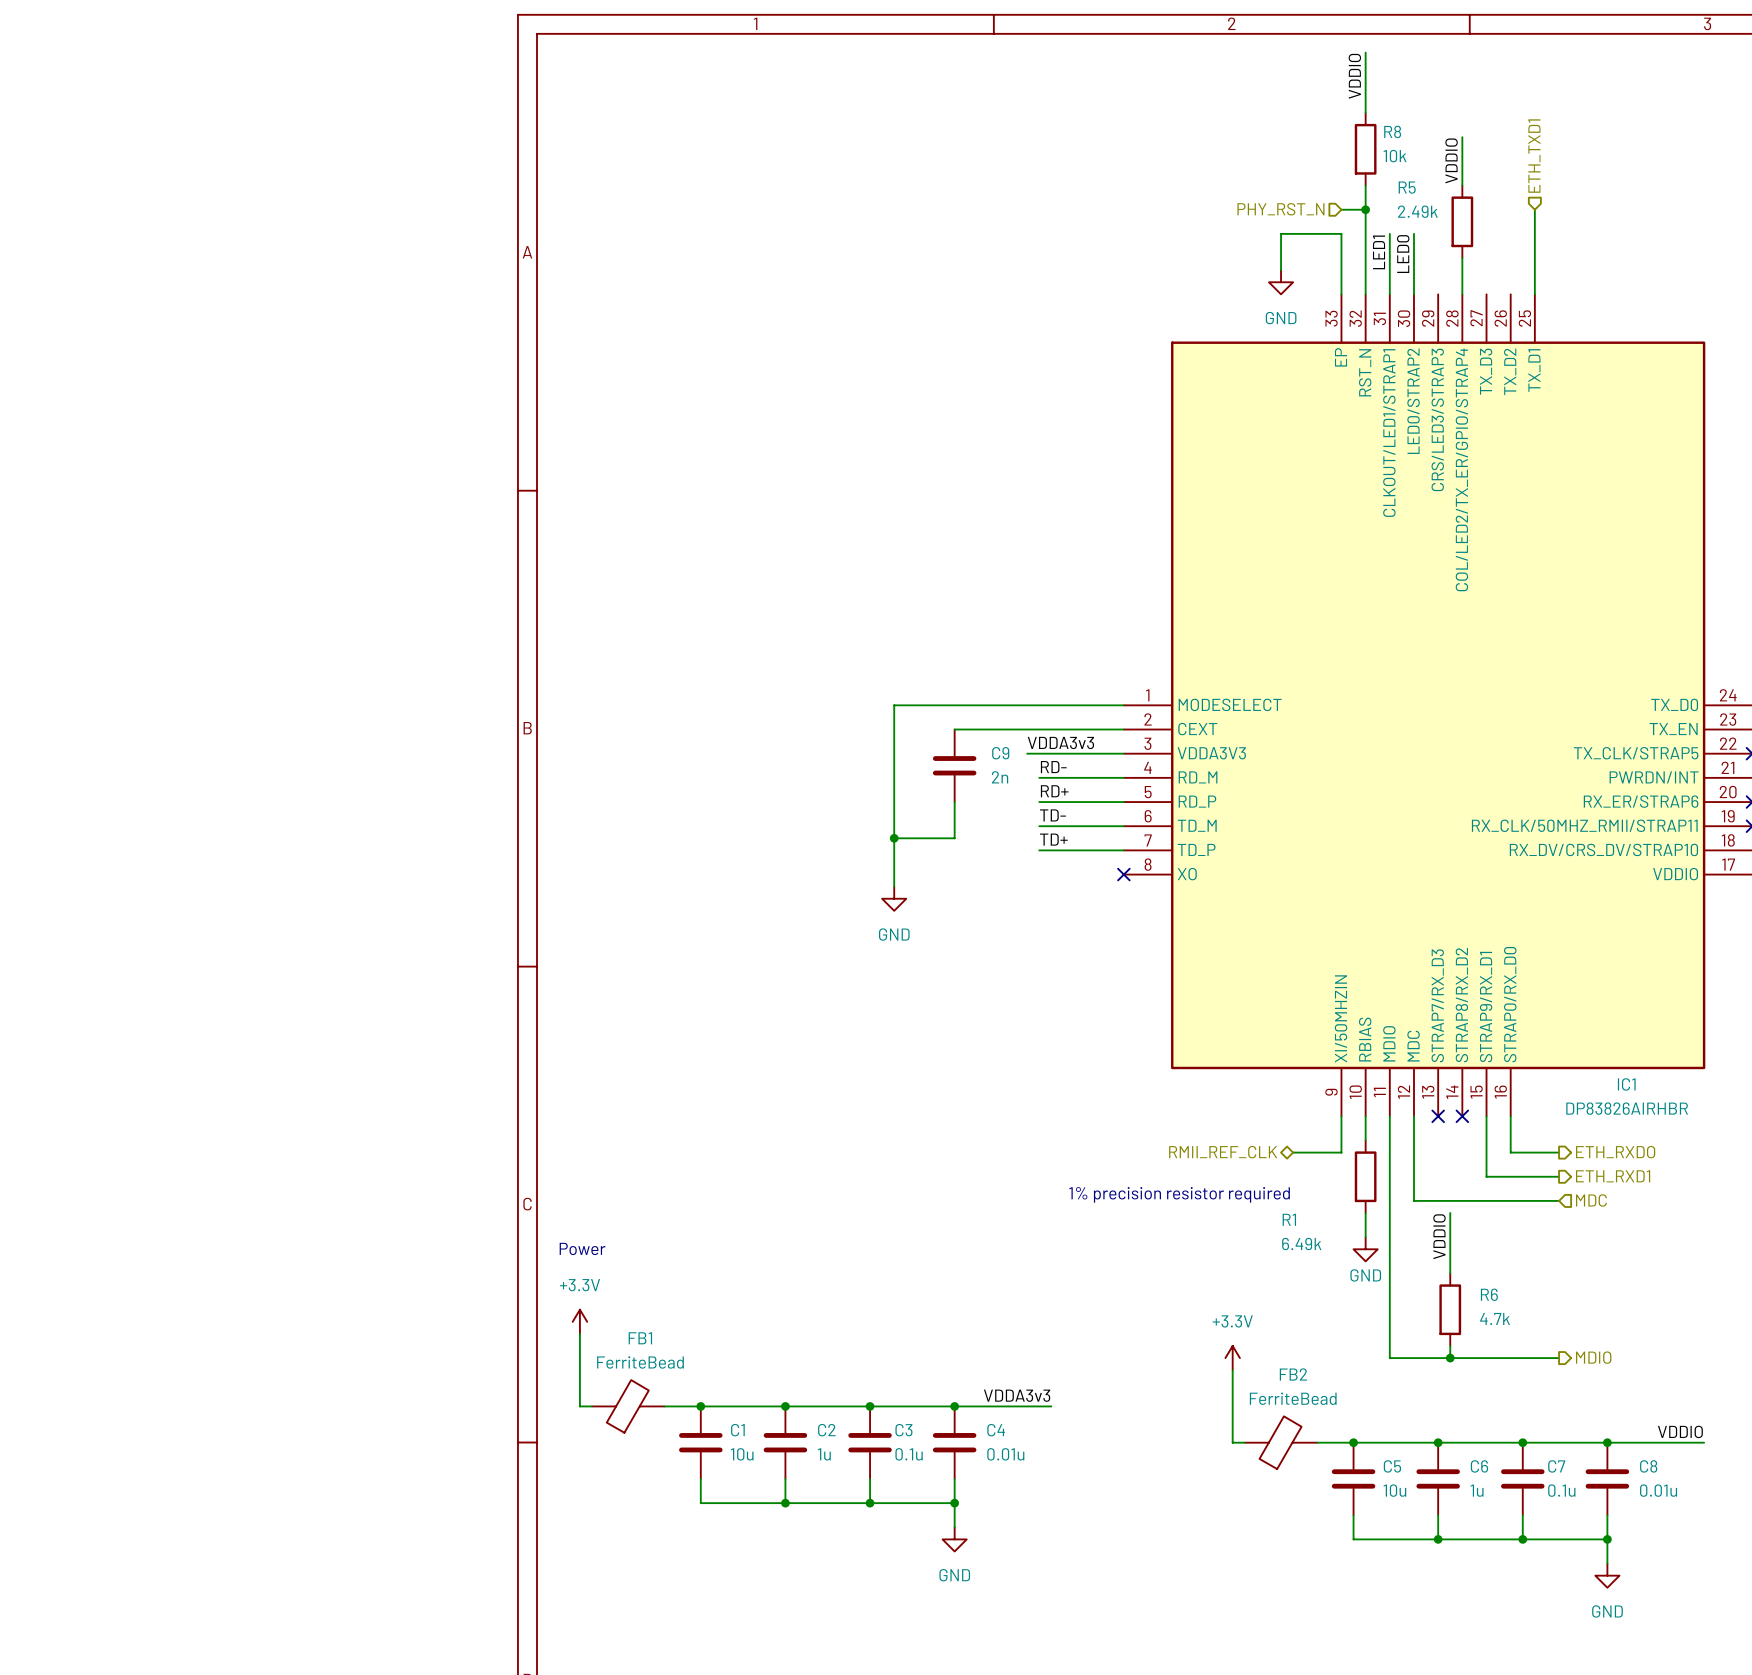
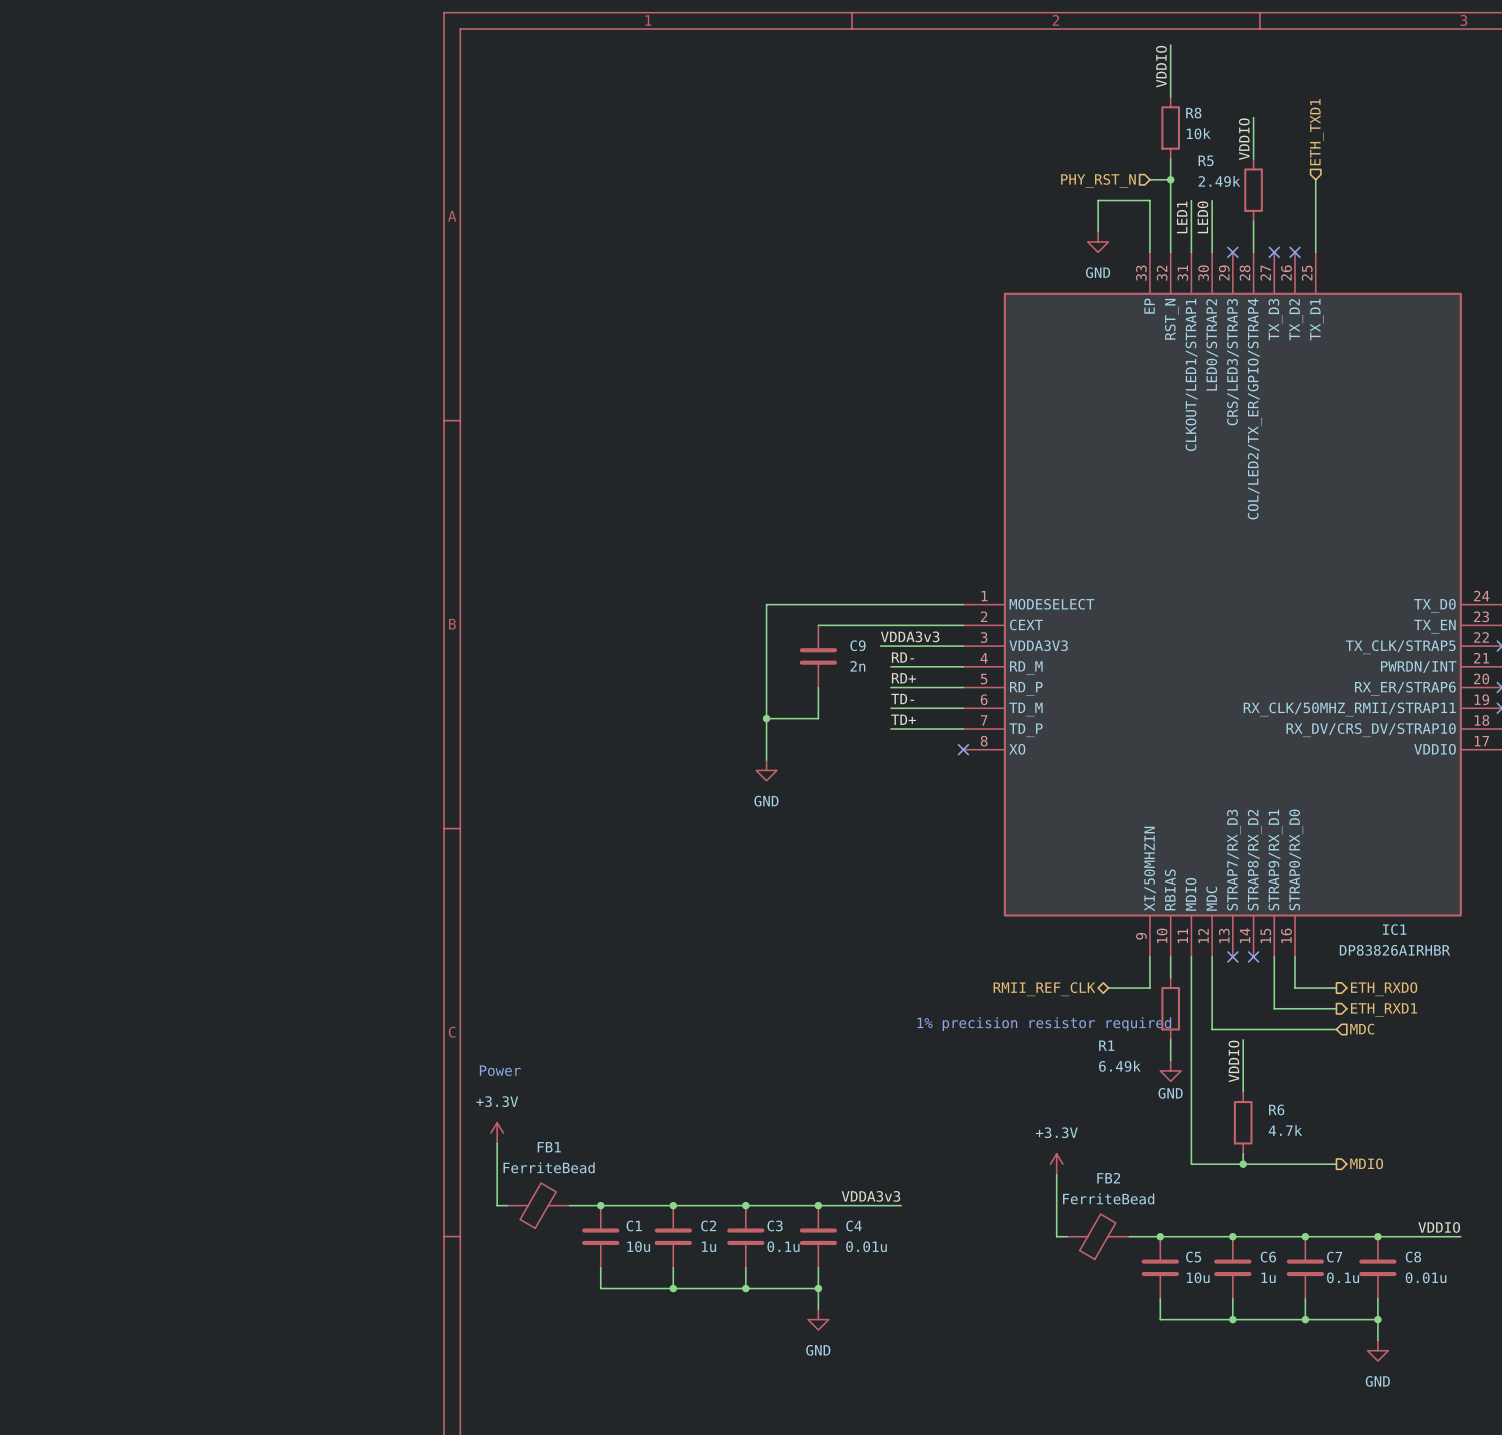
no-connect mark: none -> (1232, 252)
no-connect mark: none -> (1274, 252)
no-connect mark: none -> (1295, 252)

